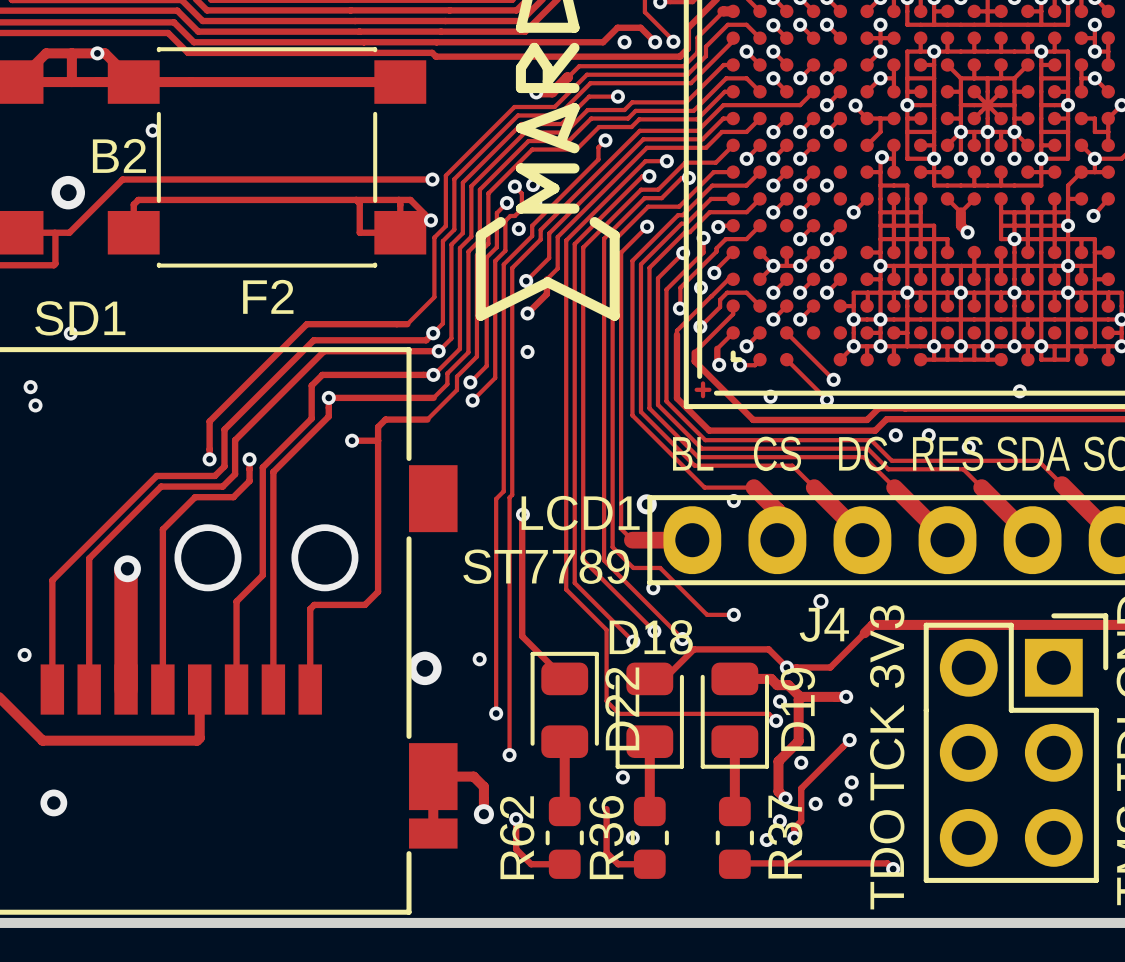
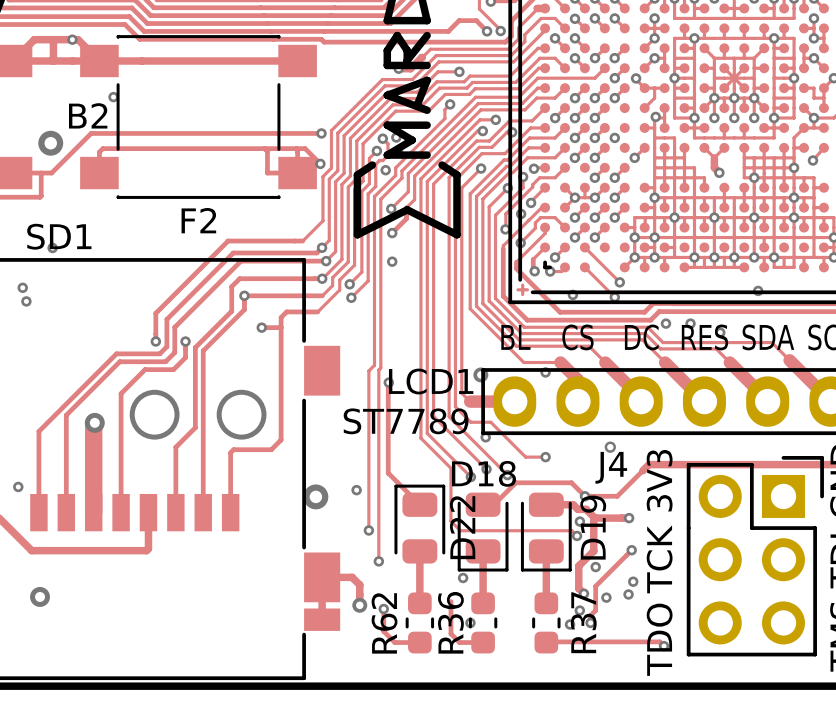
via: (624, 42) -> none

